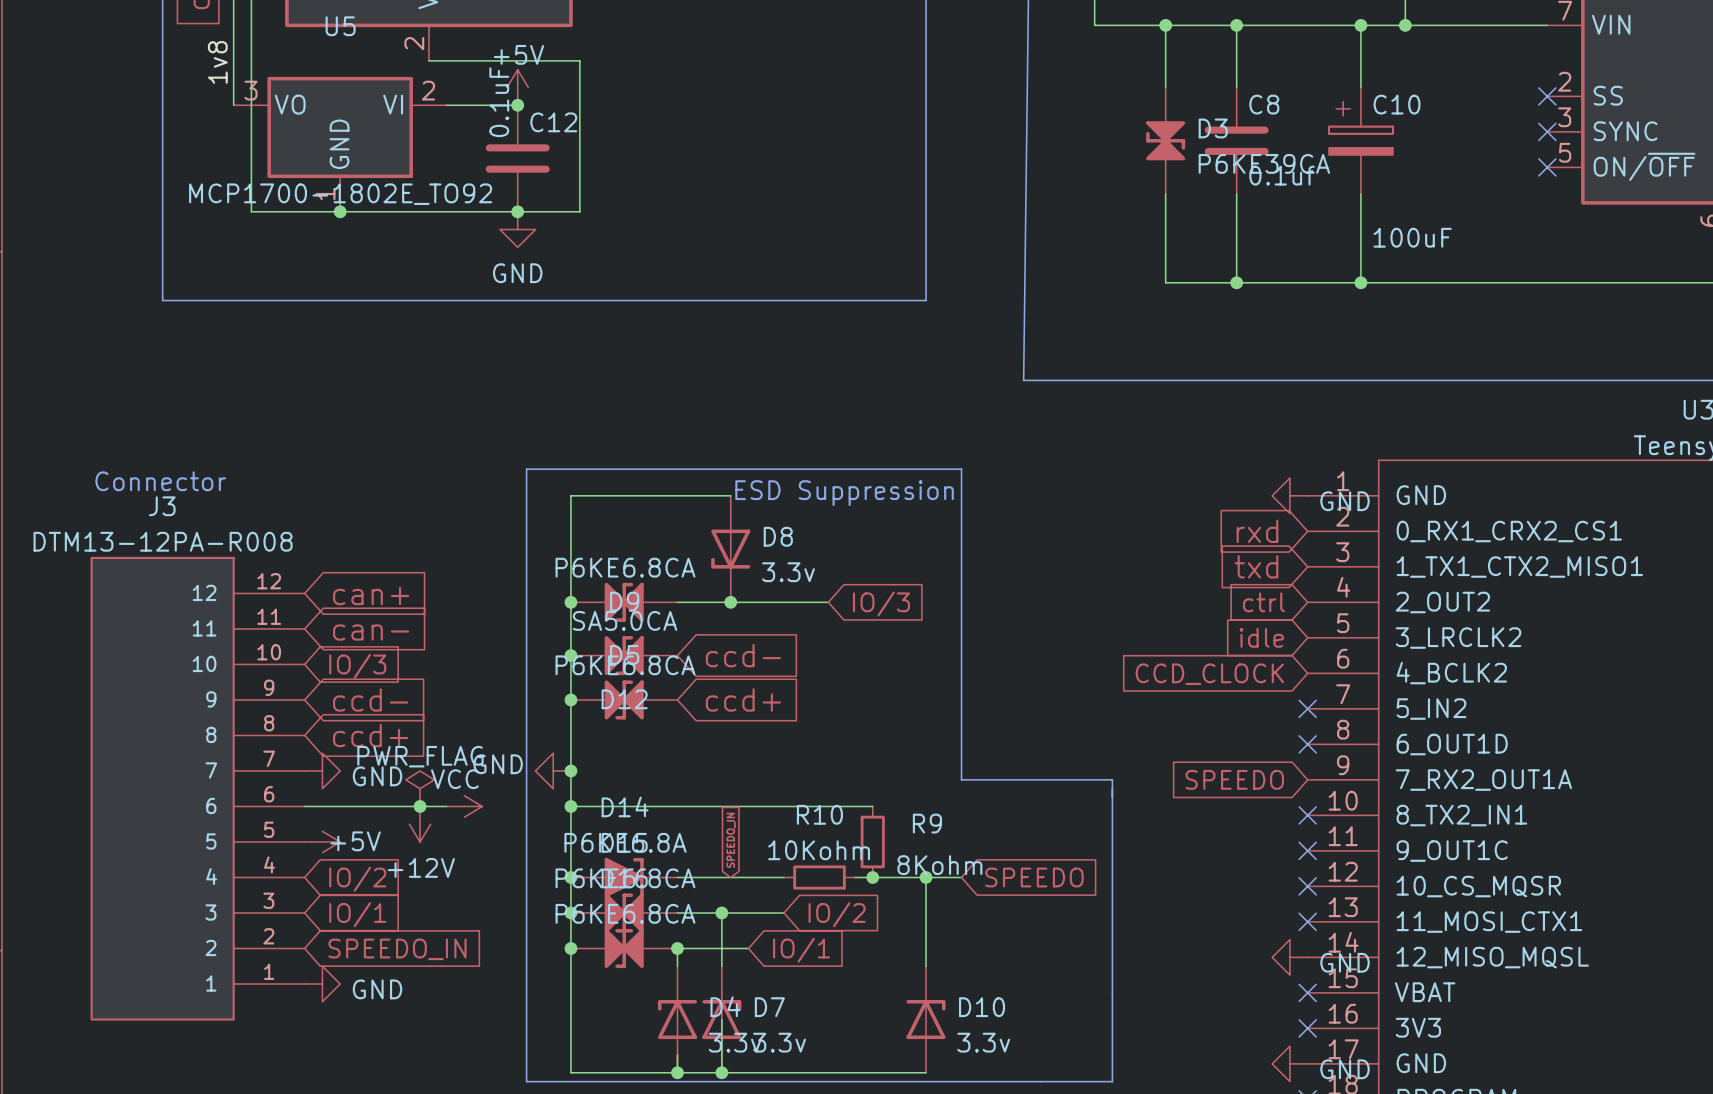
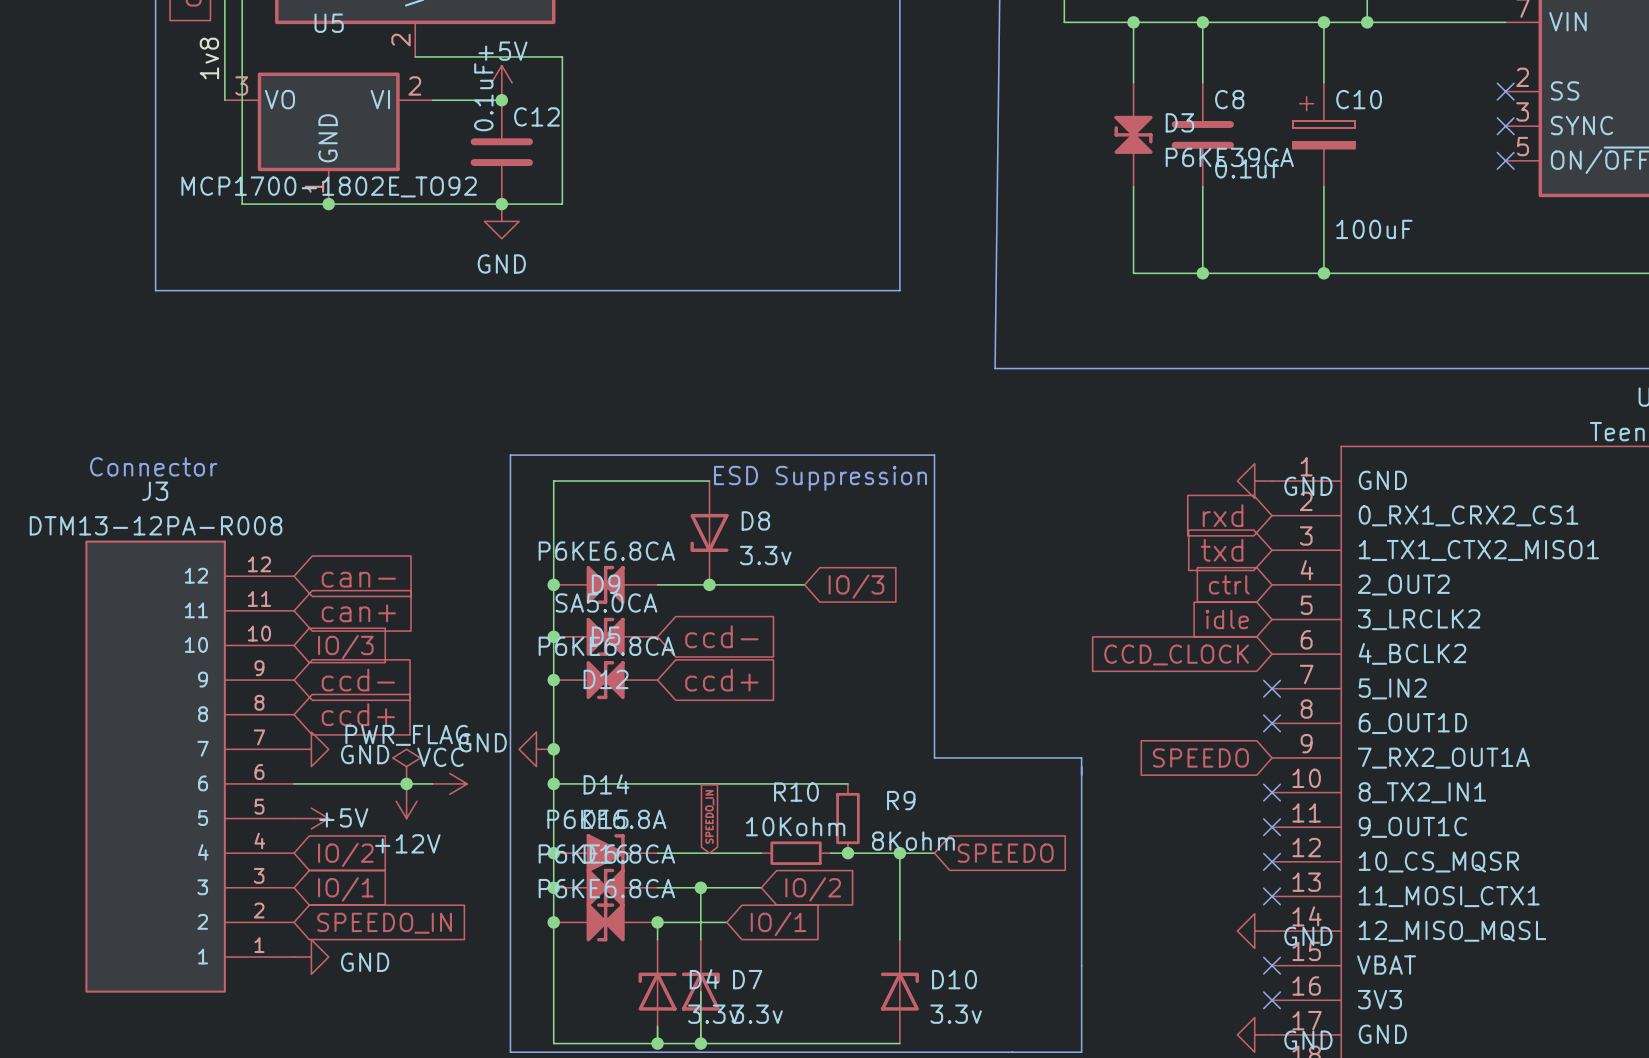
global label: can+ (371, 595) -> can- (358, 579)
global label: can- (371, 632) -> can+ (358, 613)

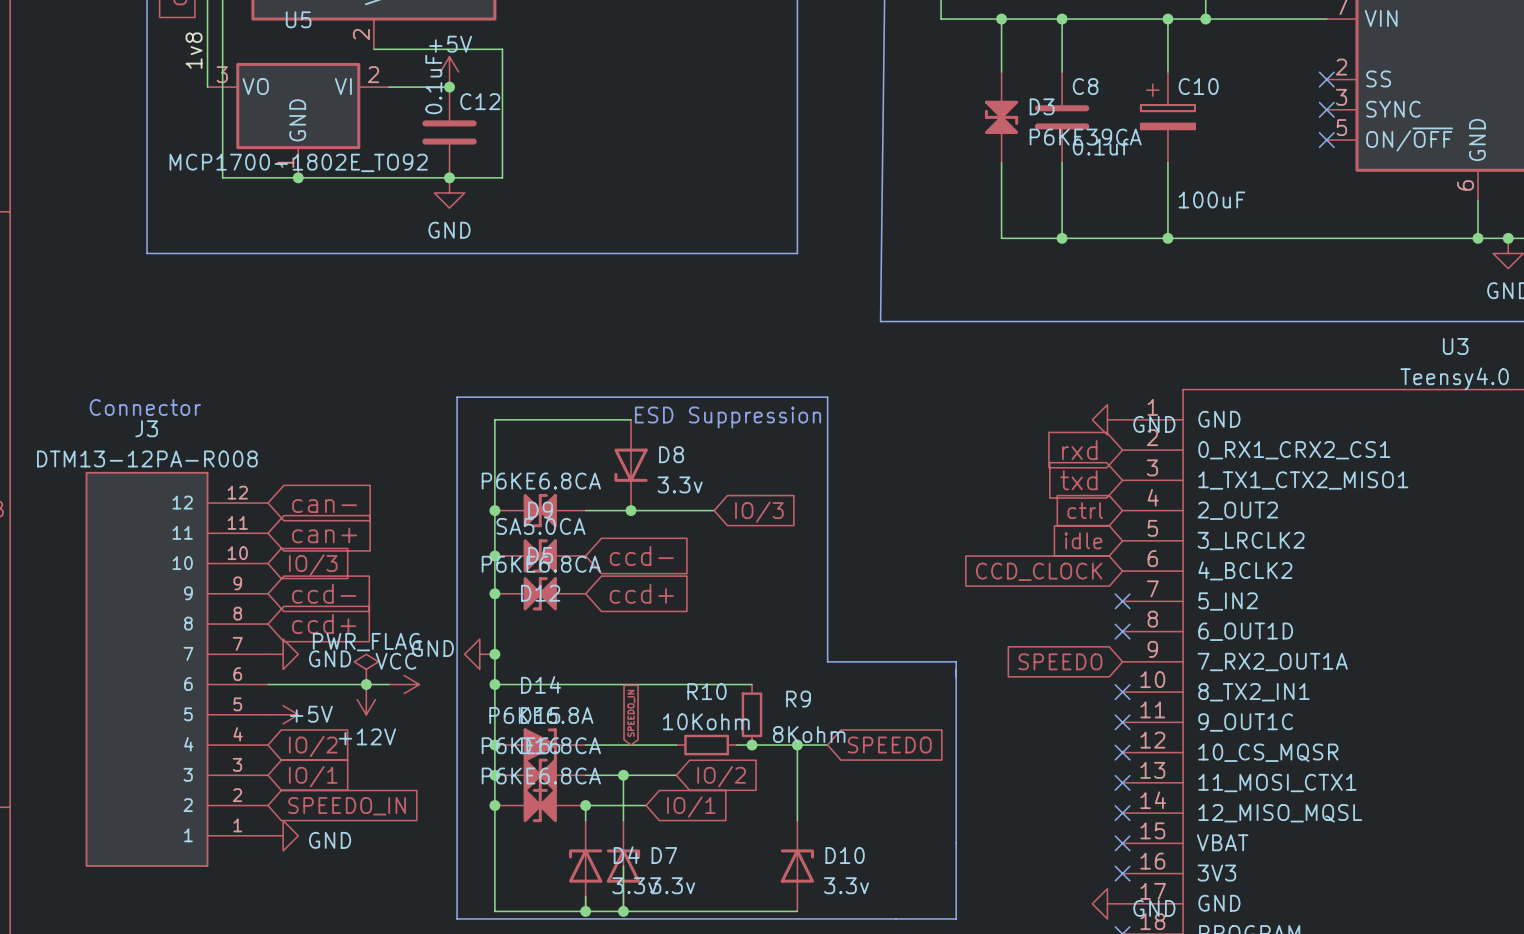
power symbol: GND (1254, 931) -> none
no-connect mark: none -> (1122, 813)

